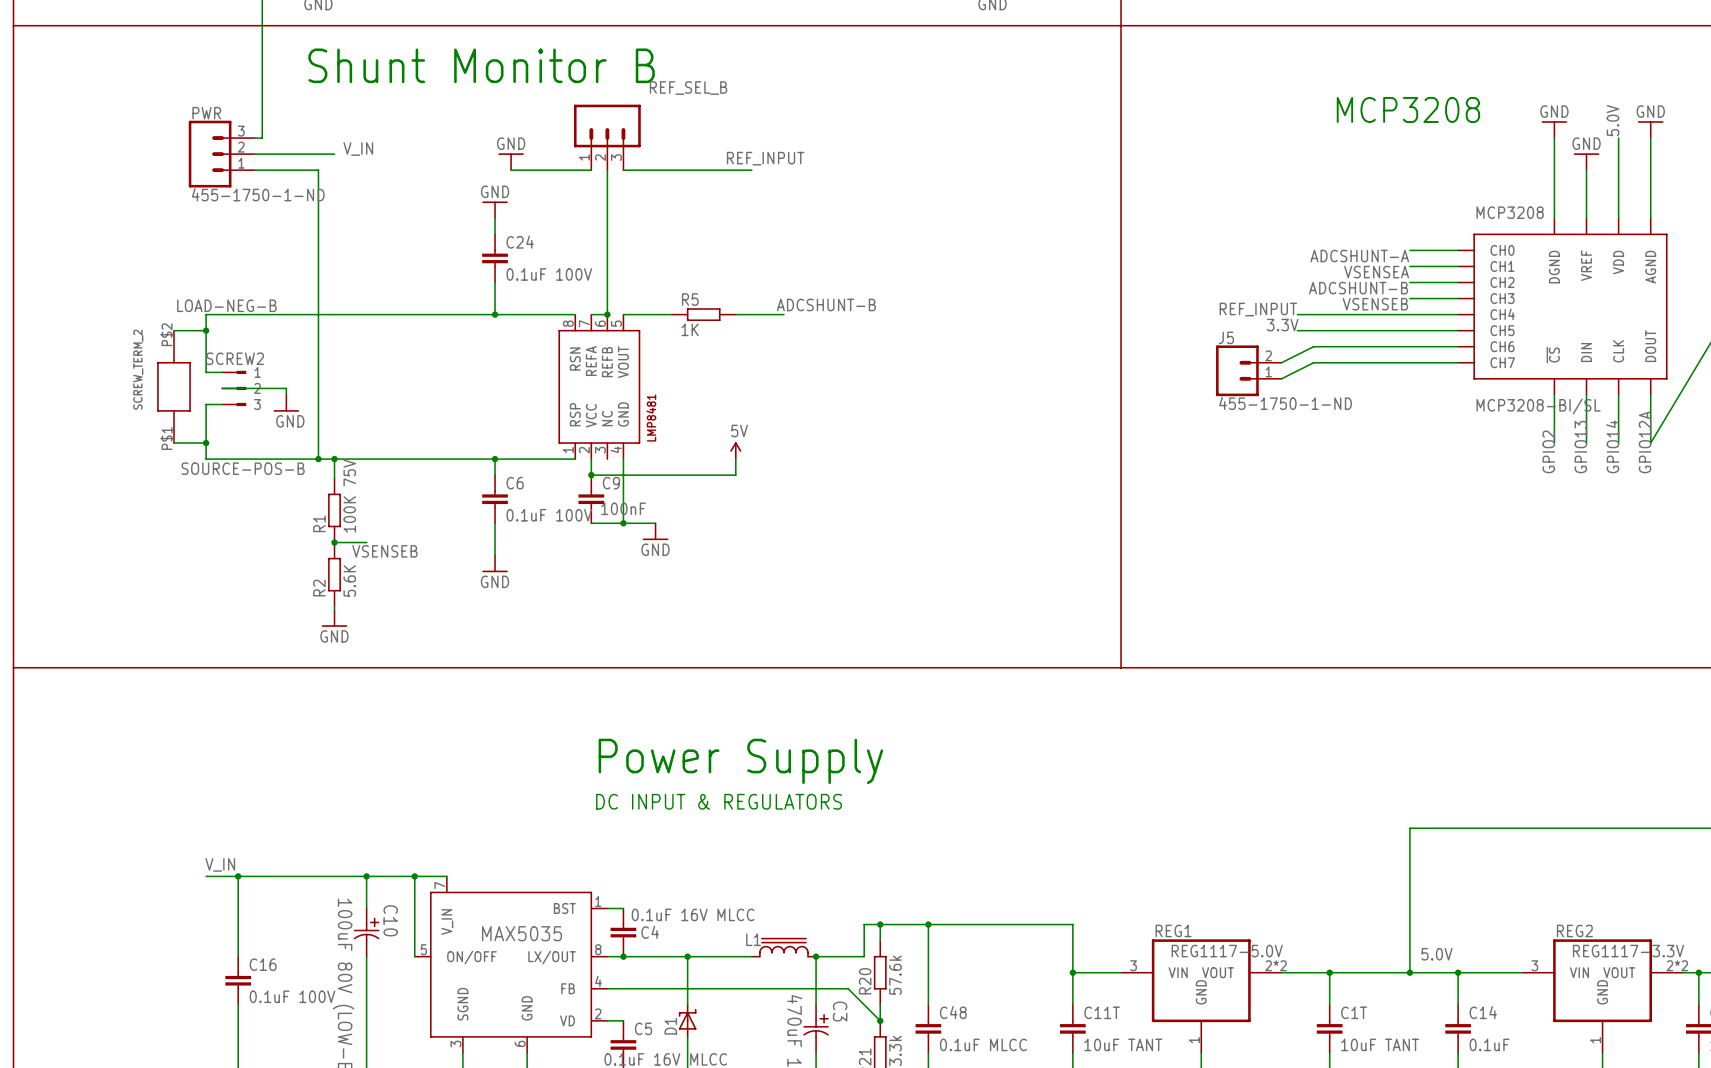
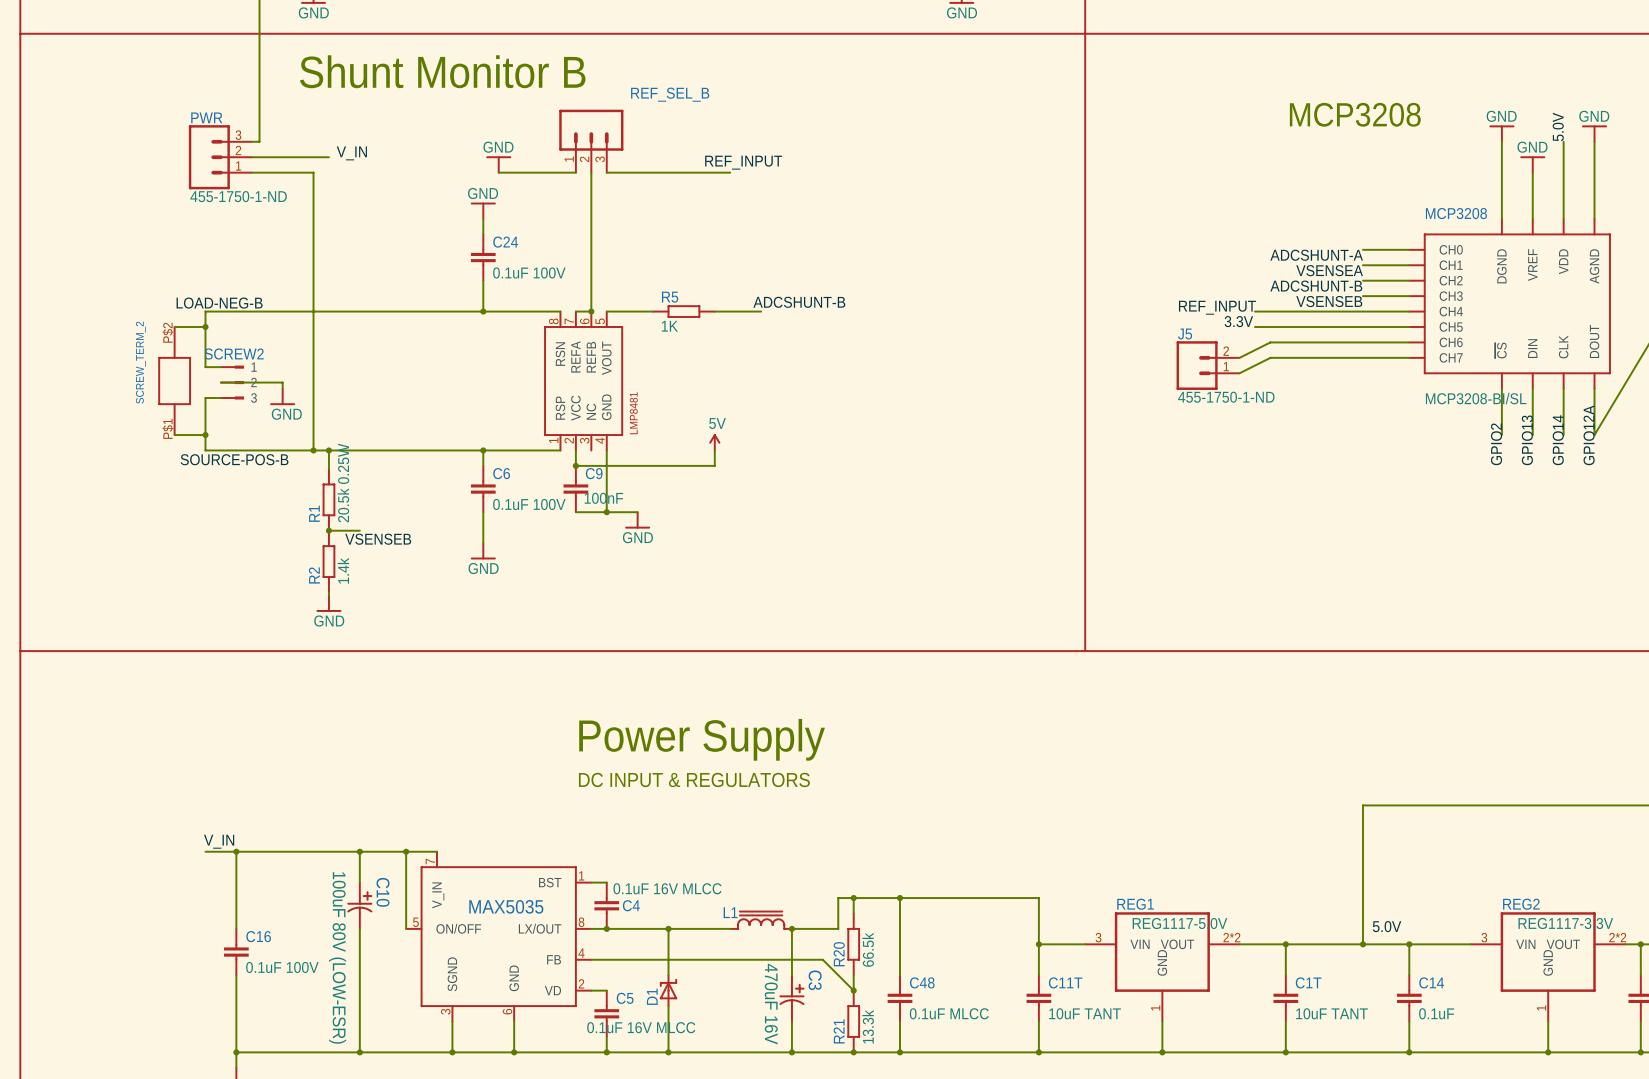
R1 value: 100K 75V (349, 496) -> 20.5k 0.25W (343, 483)
R2 value: 5.6K (349, 581) -> 1.4k (343, 570)
R20 value: 57.6k (895, 975) -> 66.5k (868, 949)

